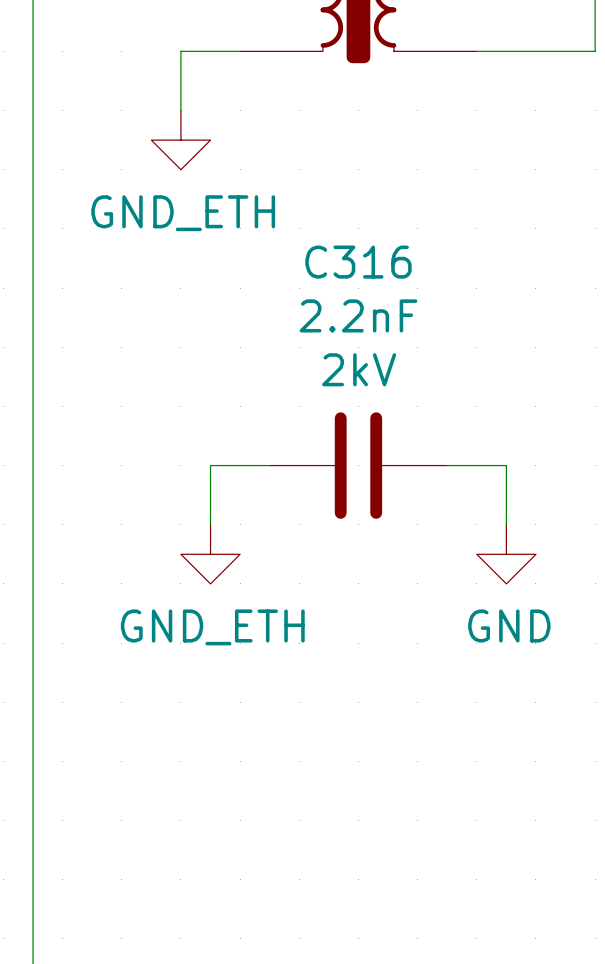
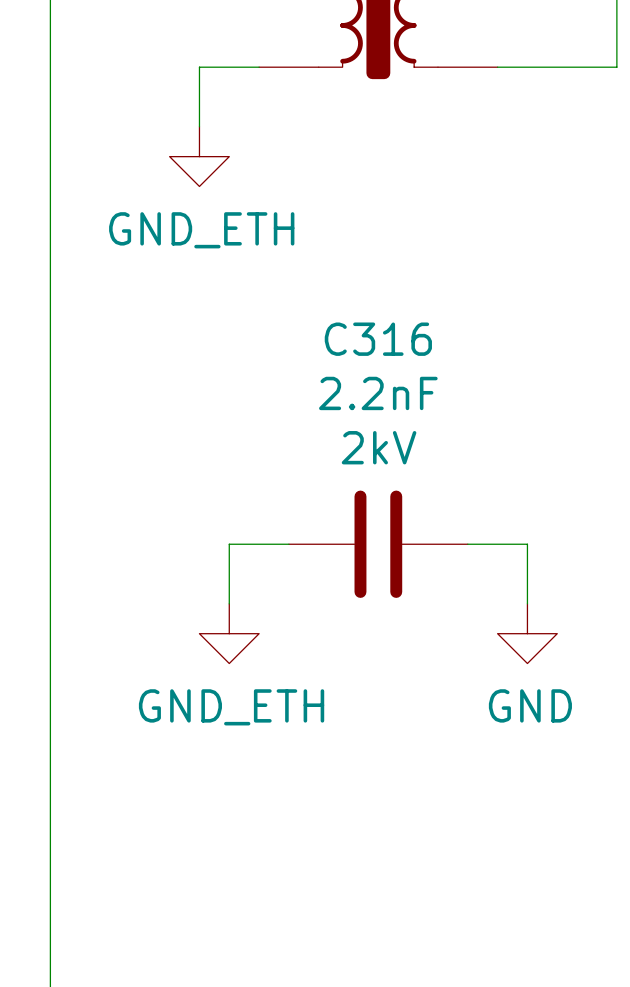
wire: (269, 465) (210, 465) (210, 524) -> (288, 544) (229, 544) (229, 603)
C316 position: (358, 465) -> (378, 544)
wire: (447, 465) (506, 465) (506, 524) -> (467, 544) (527, 544) (527, 603)
power symbol position: GND_ETH (210, 554) -> GND_ETH (229, 633)
power symbol position: GND (506, 554) -> GND (527, 633)

